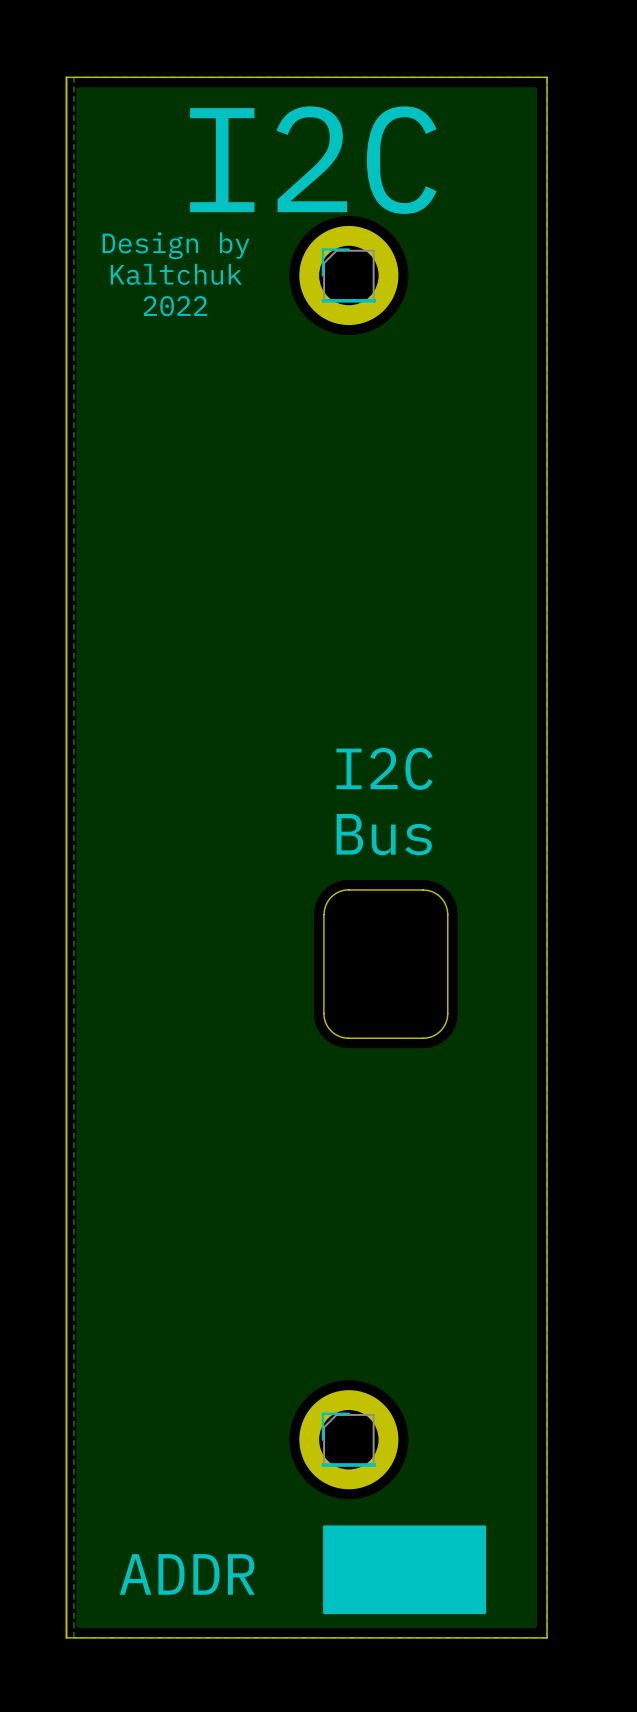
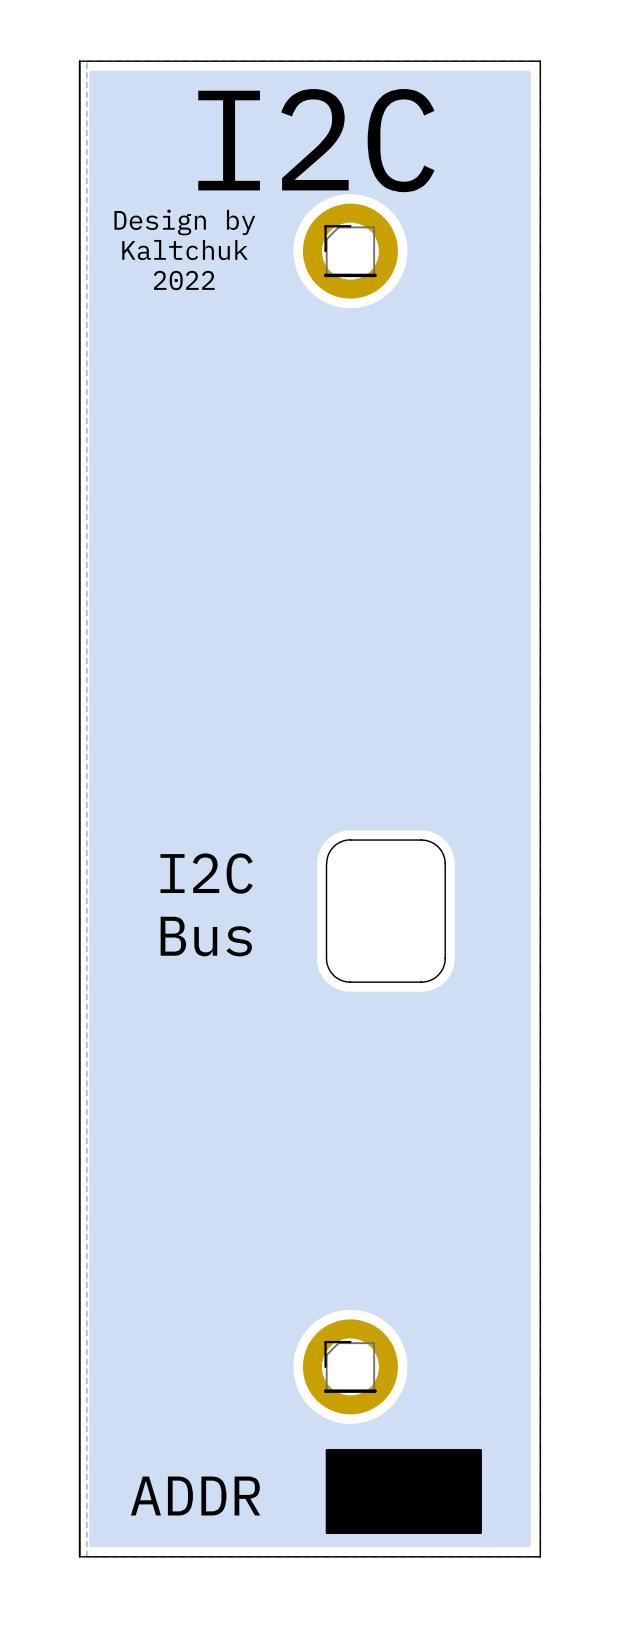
text position: I2C (384, 768) -> I2C (206, 873)
text position: Bus (384, 834) -> Bus (206, 936)

